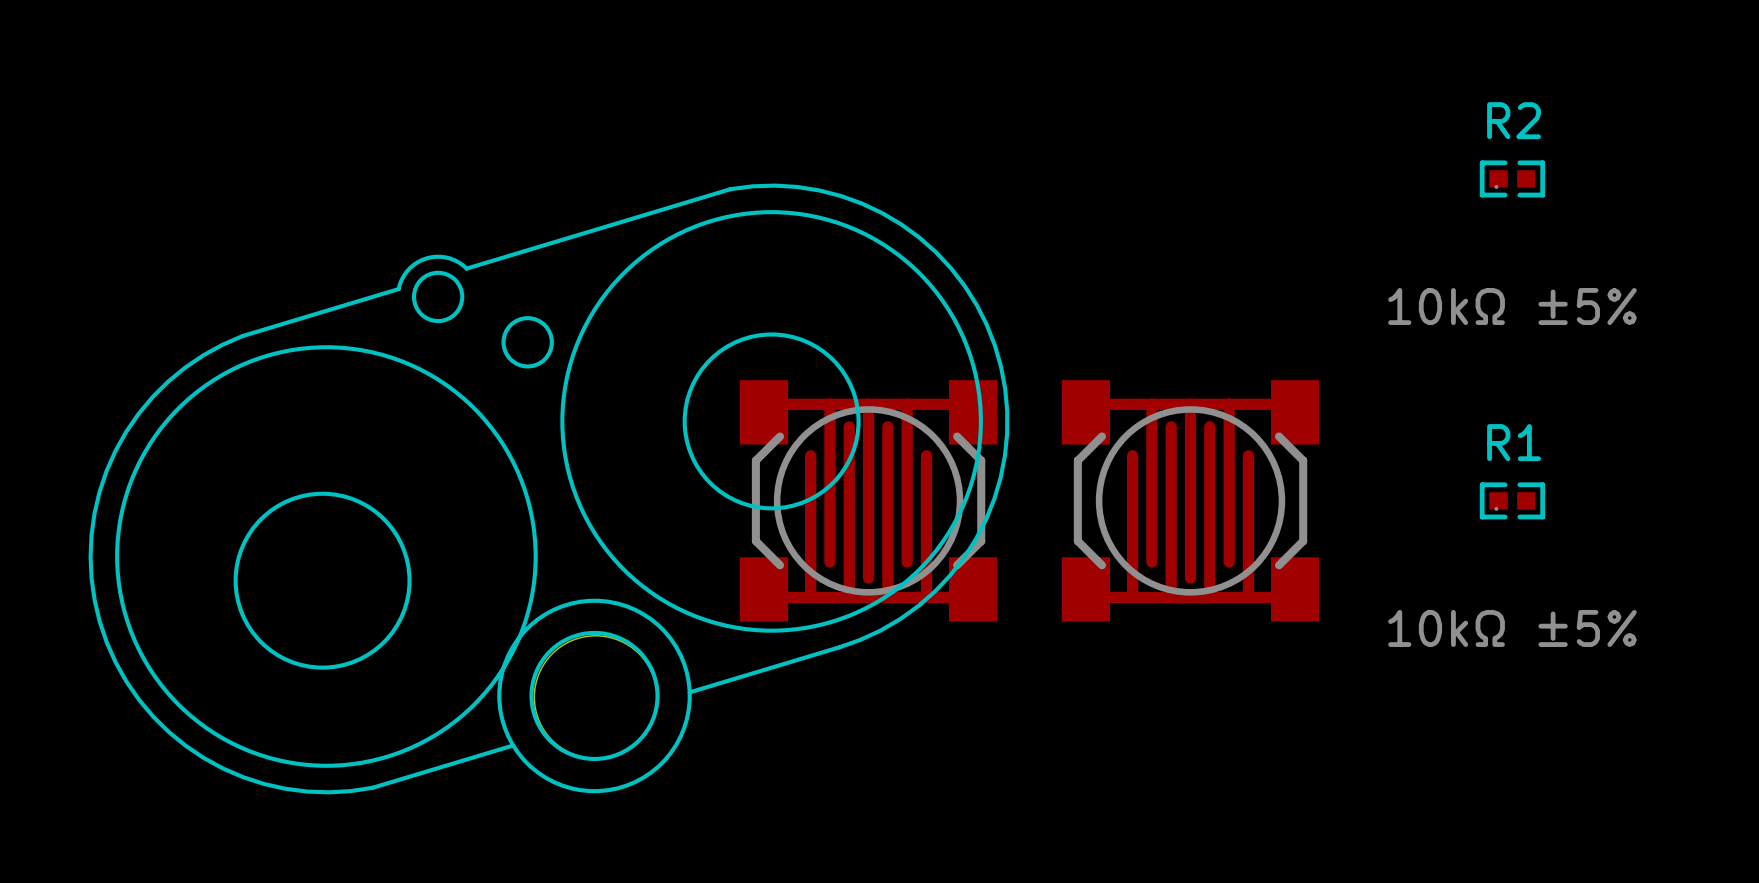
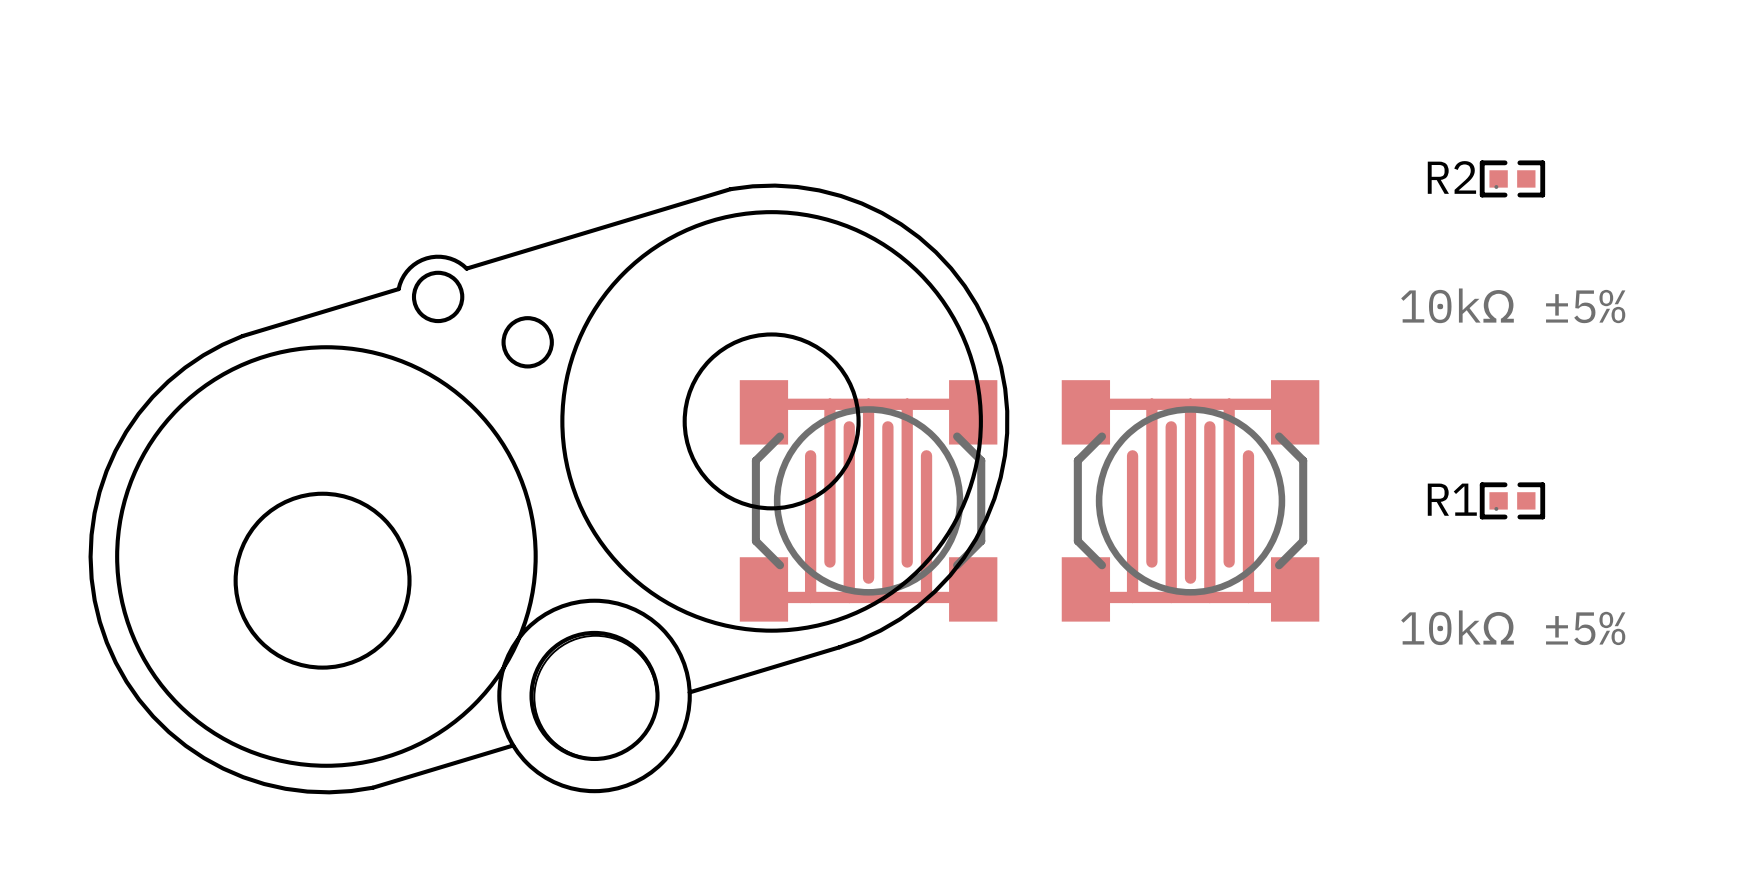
R2 name position: R2 (1514, 120) -> R2 (1451, 177)
R1 name position: R1 (1514, 442) -> R1 (1452, 499)

